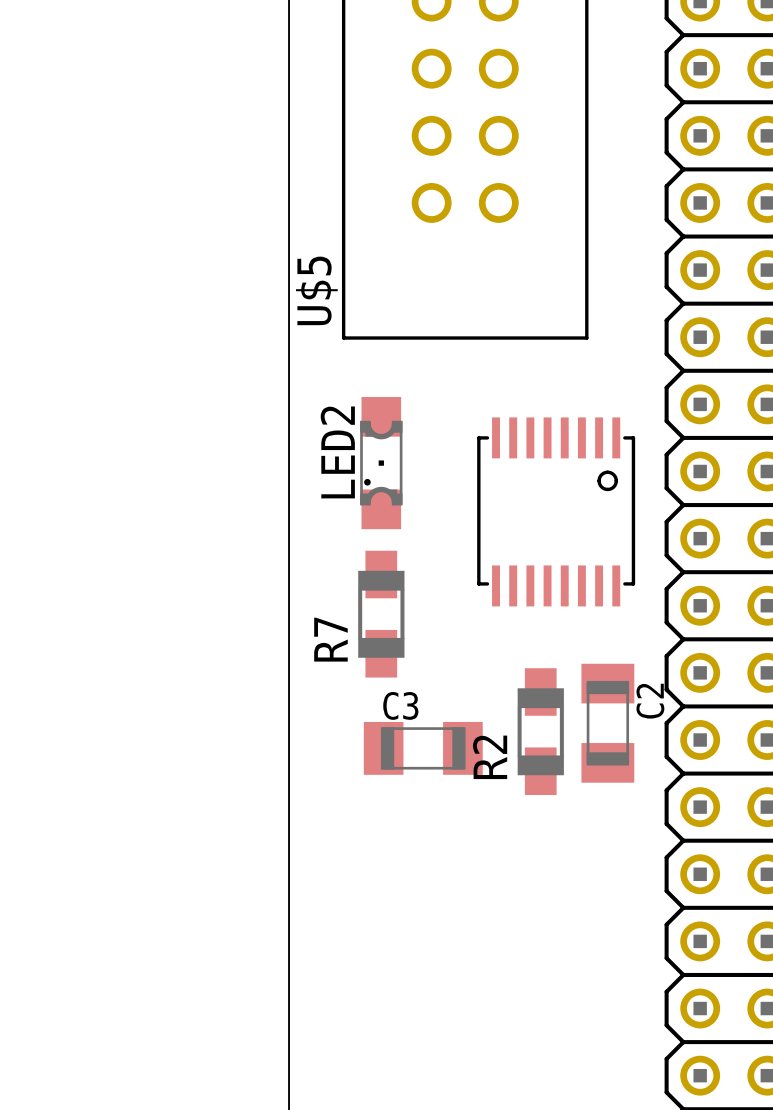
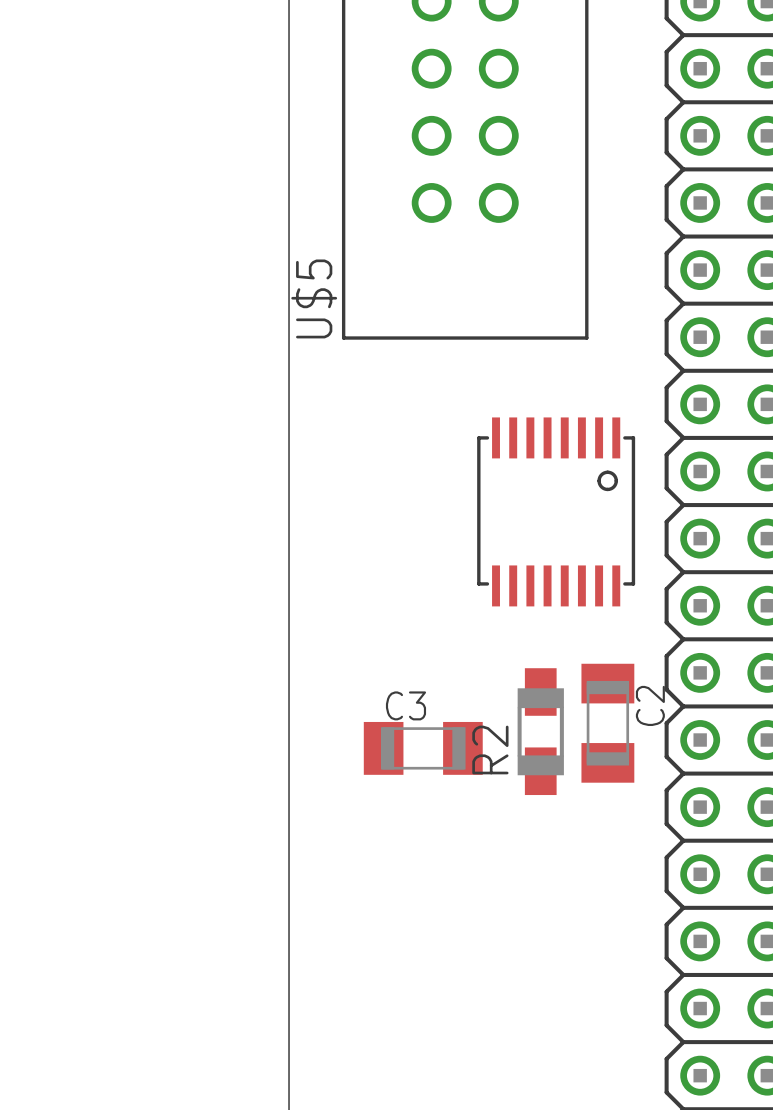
LED2: (381, 463) -> none
R7: (381, 614) -> none

